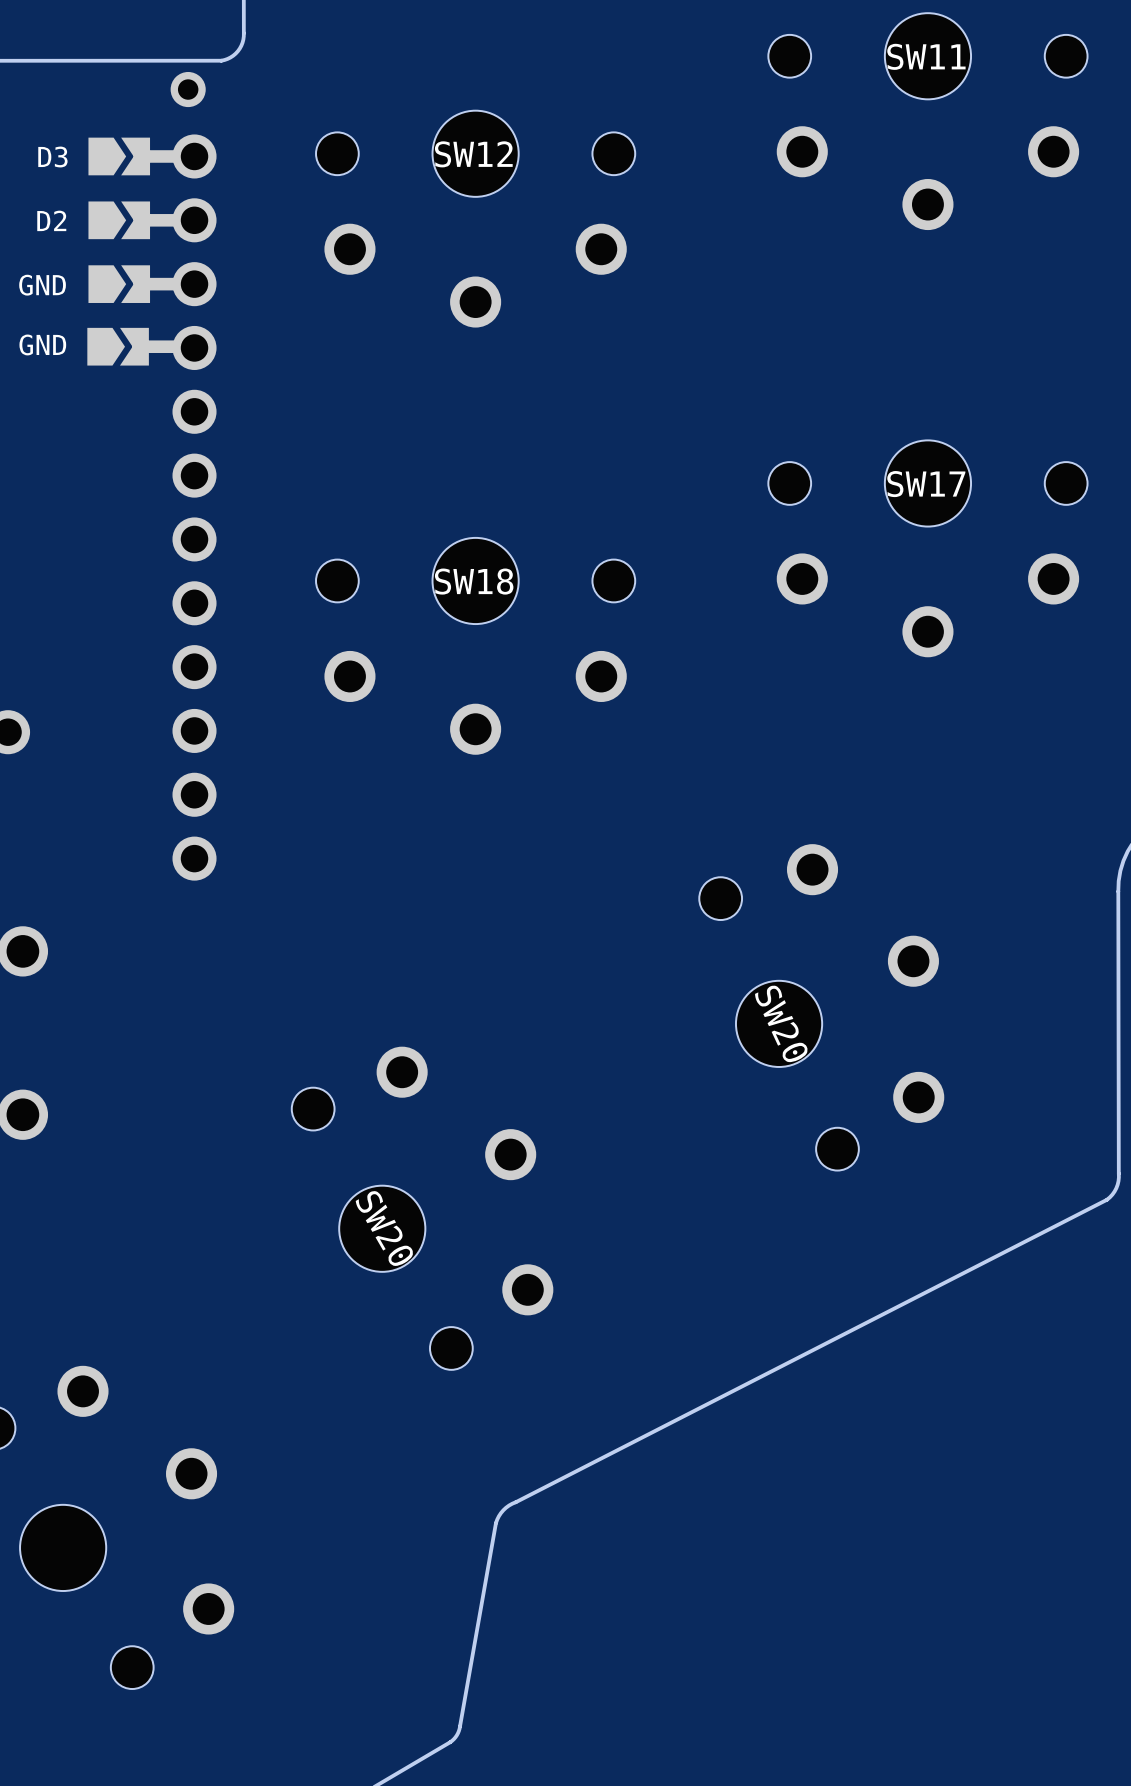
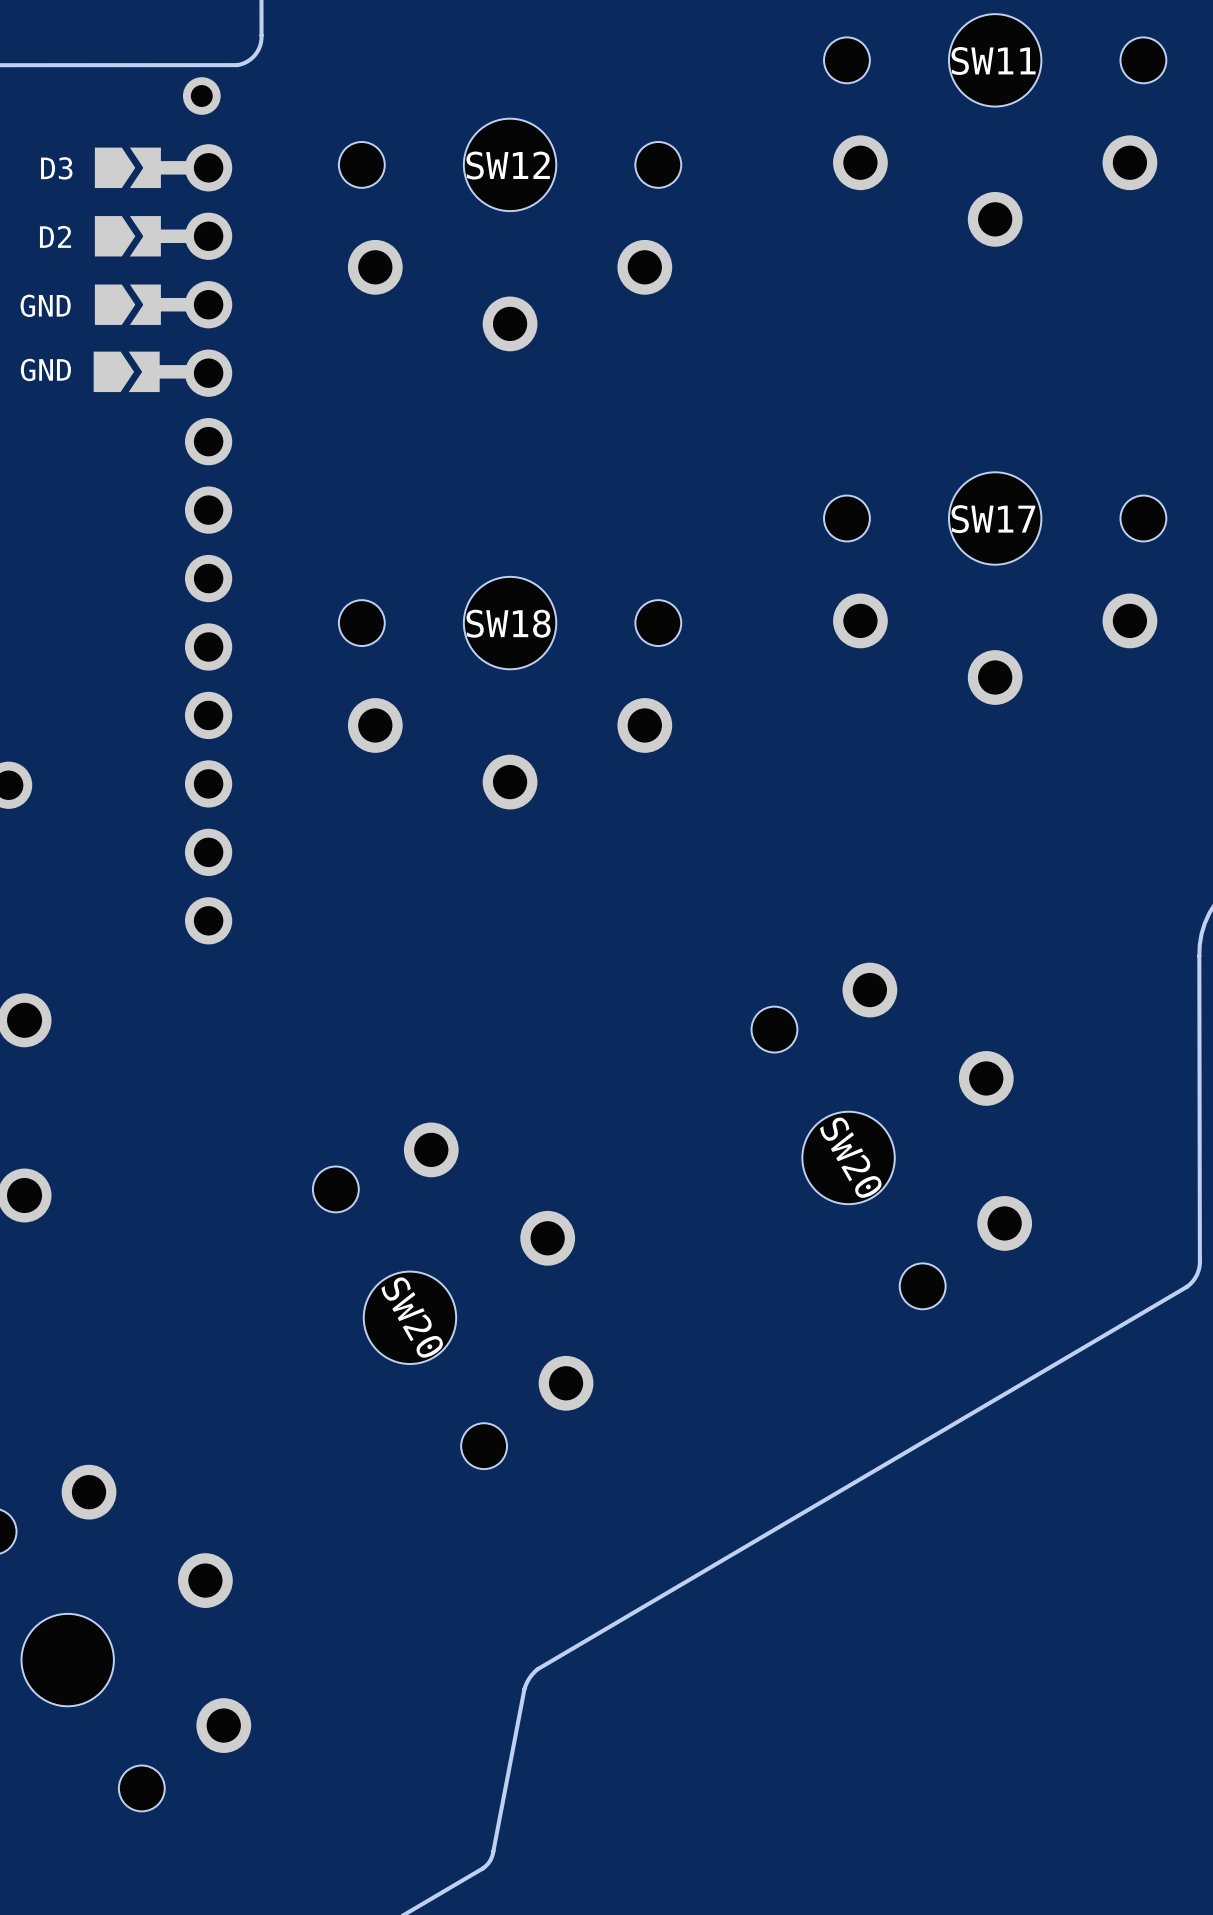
SW20: (821, 1007) -> none
SW20: none -> (891, 1135)
board edge: (1107, 1199) (506, 1507) (495, 1523) (460, 1726) -> (1187, 1286) (537, 1669) (529, 1678) (524, 1688) (493, 1851)

